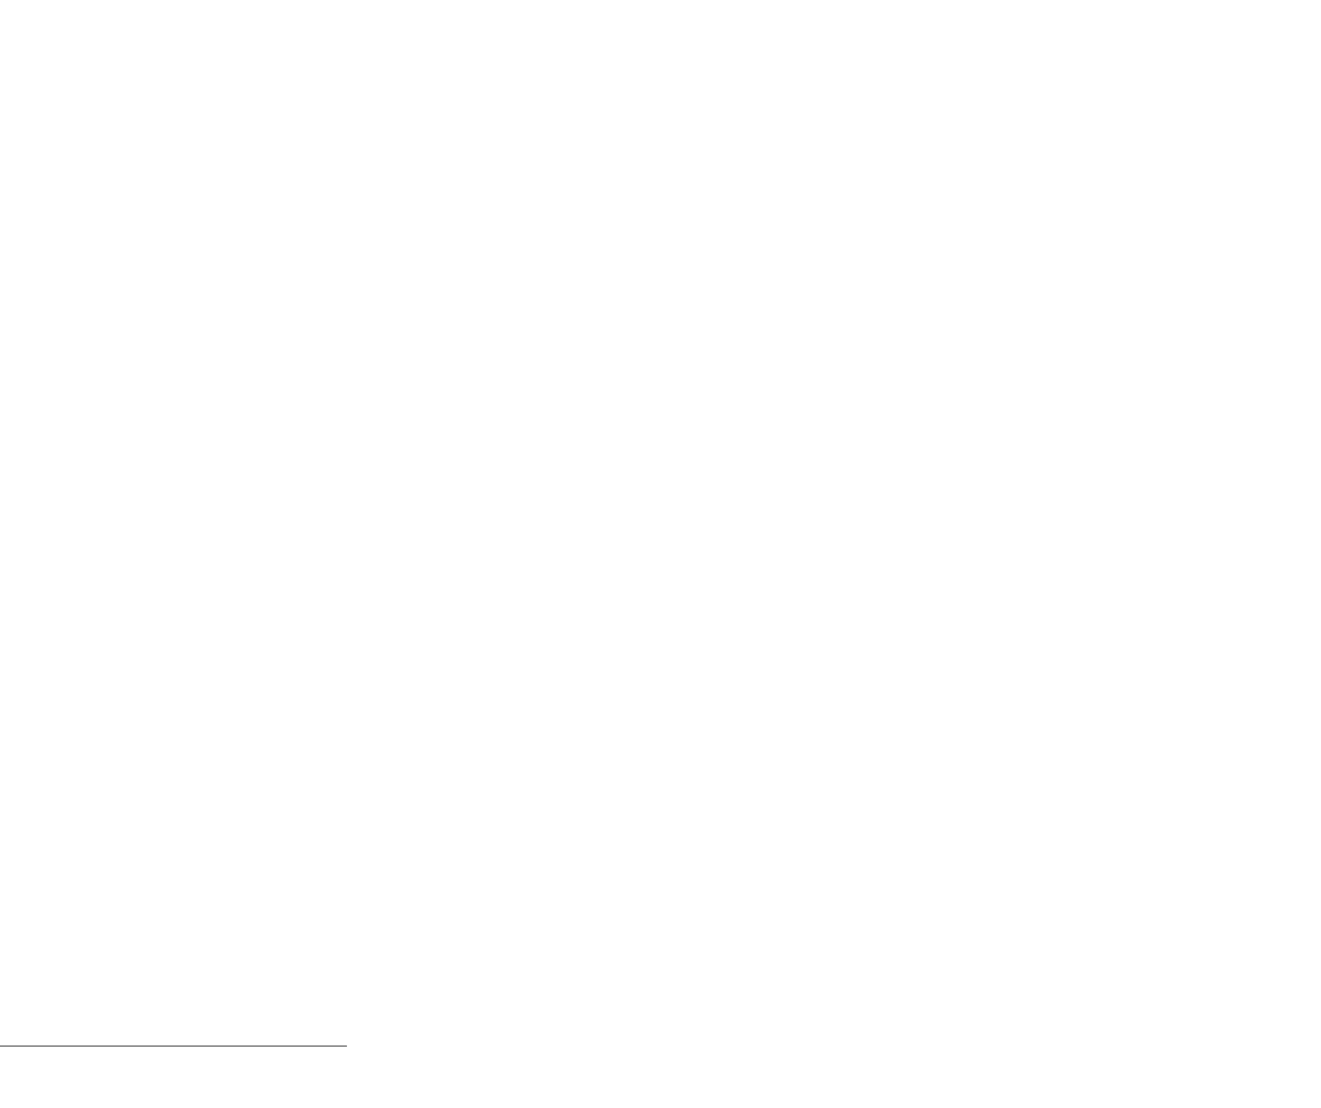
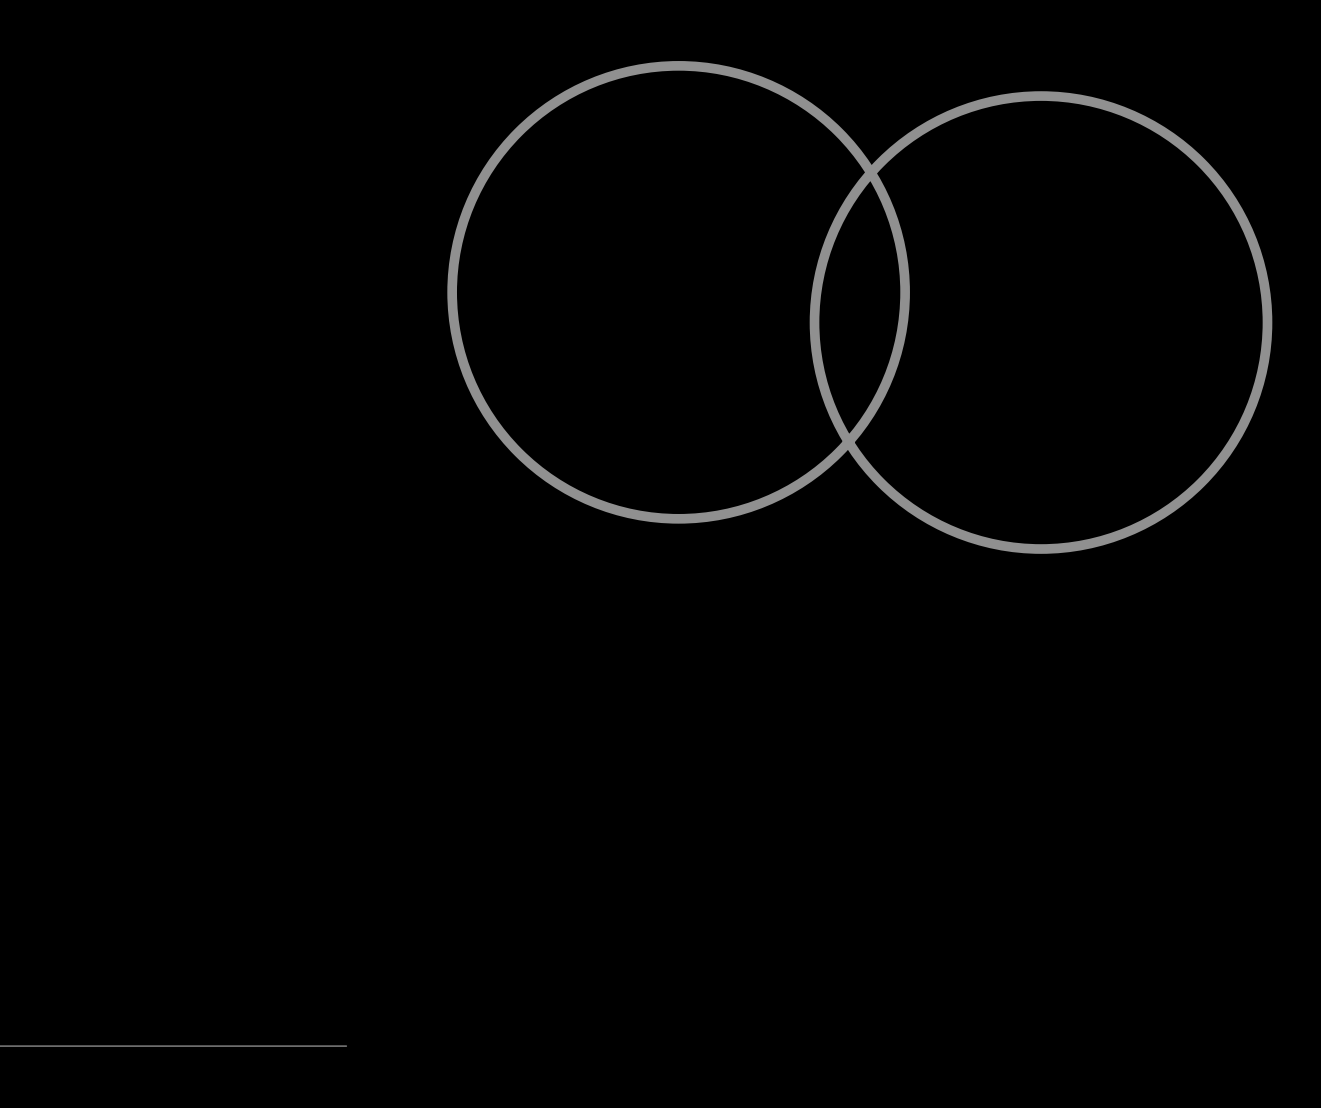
drawing: none -> [447, 61, 1273, 554]

